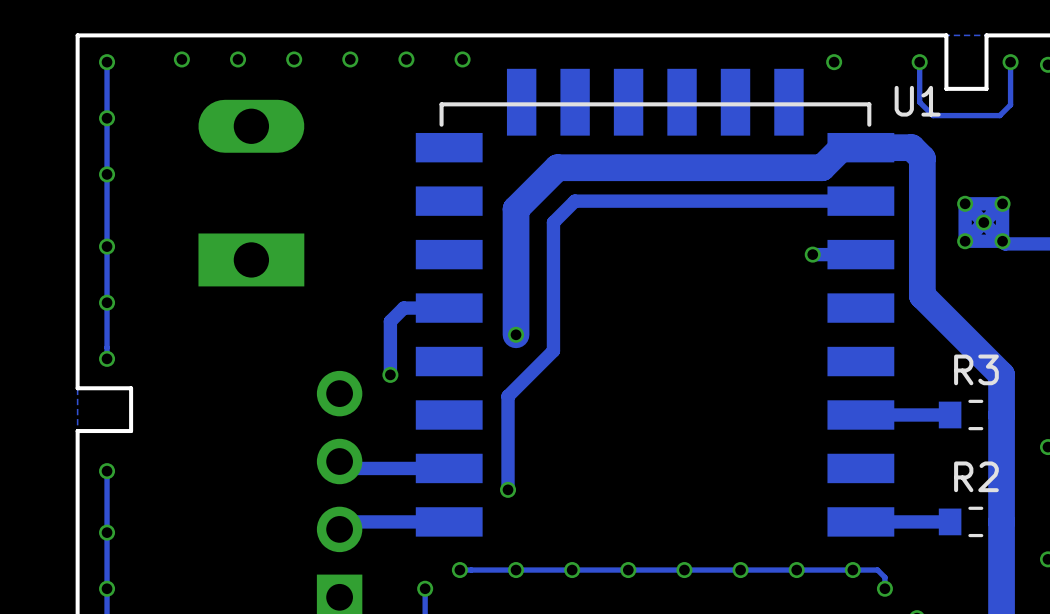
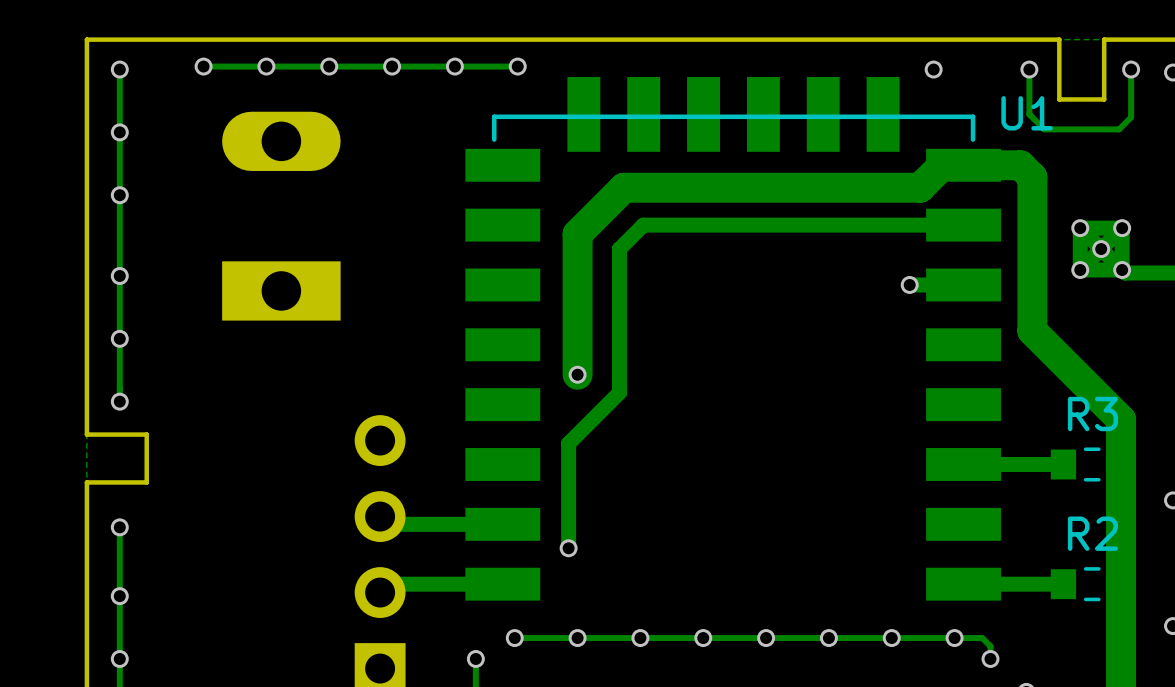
track: none -> (517, 66) (203, 66)
track: (467, 308) (403, 308) (390, 321) (390, 374) -> none
via: (390, 374) -> none

